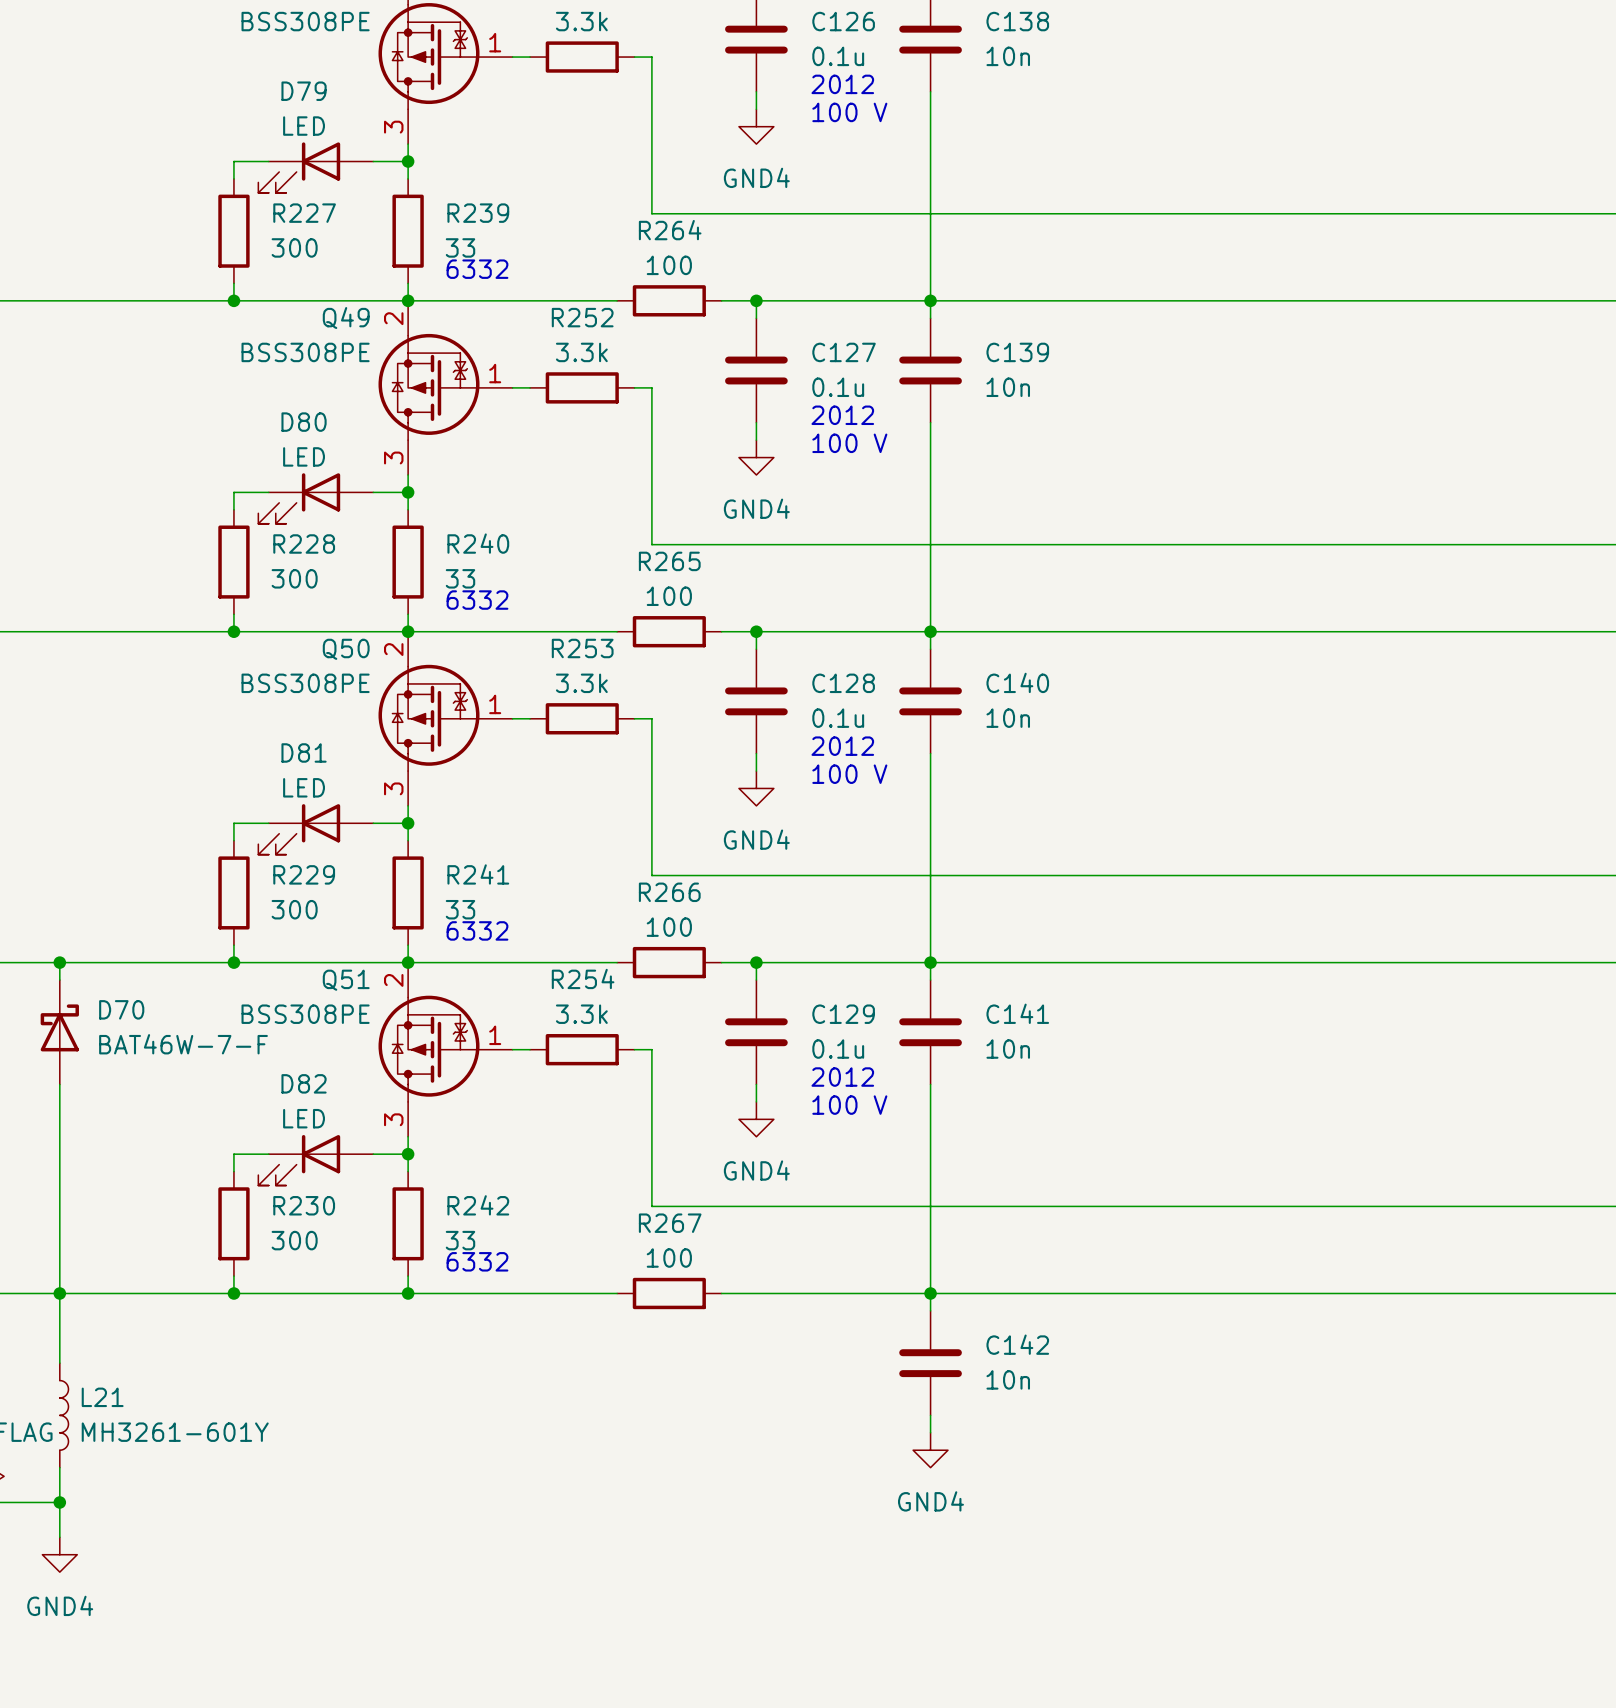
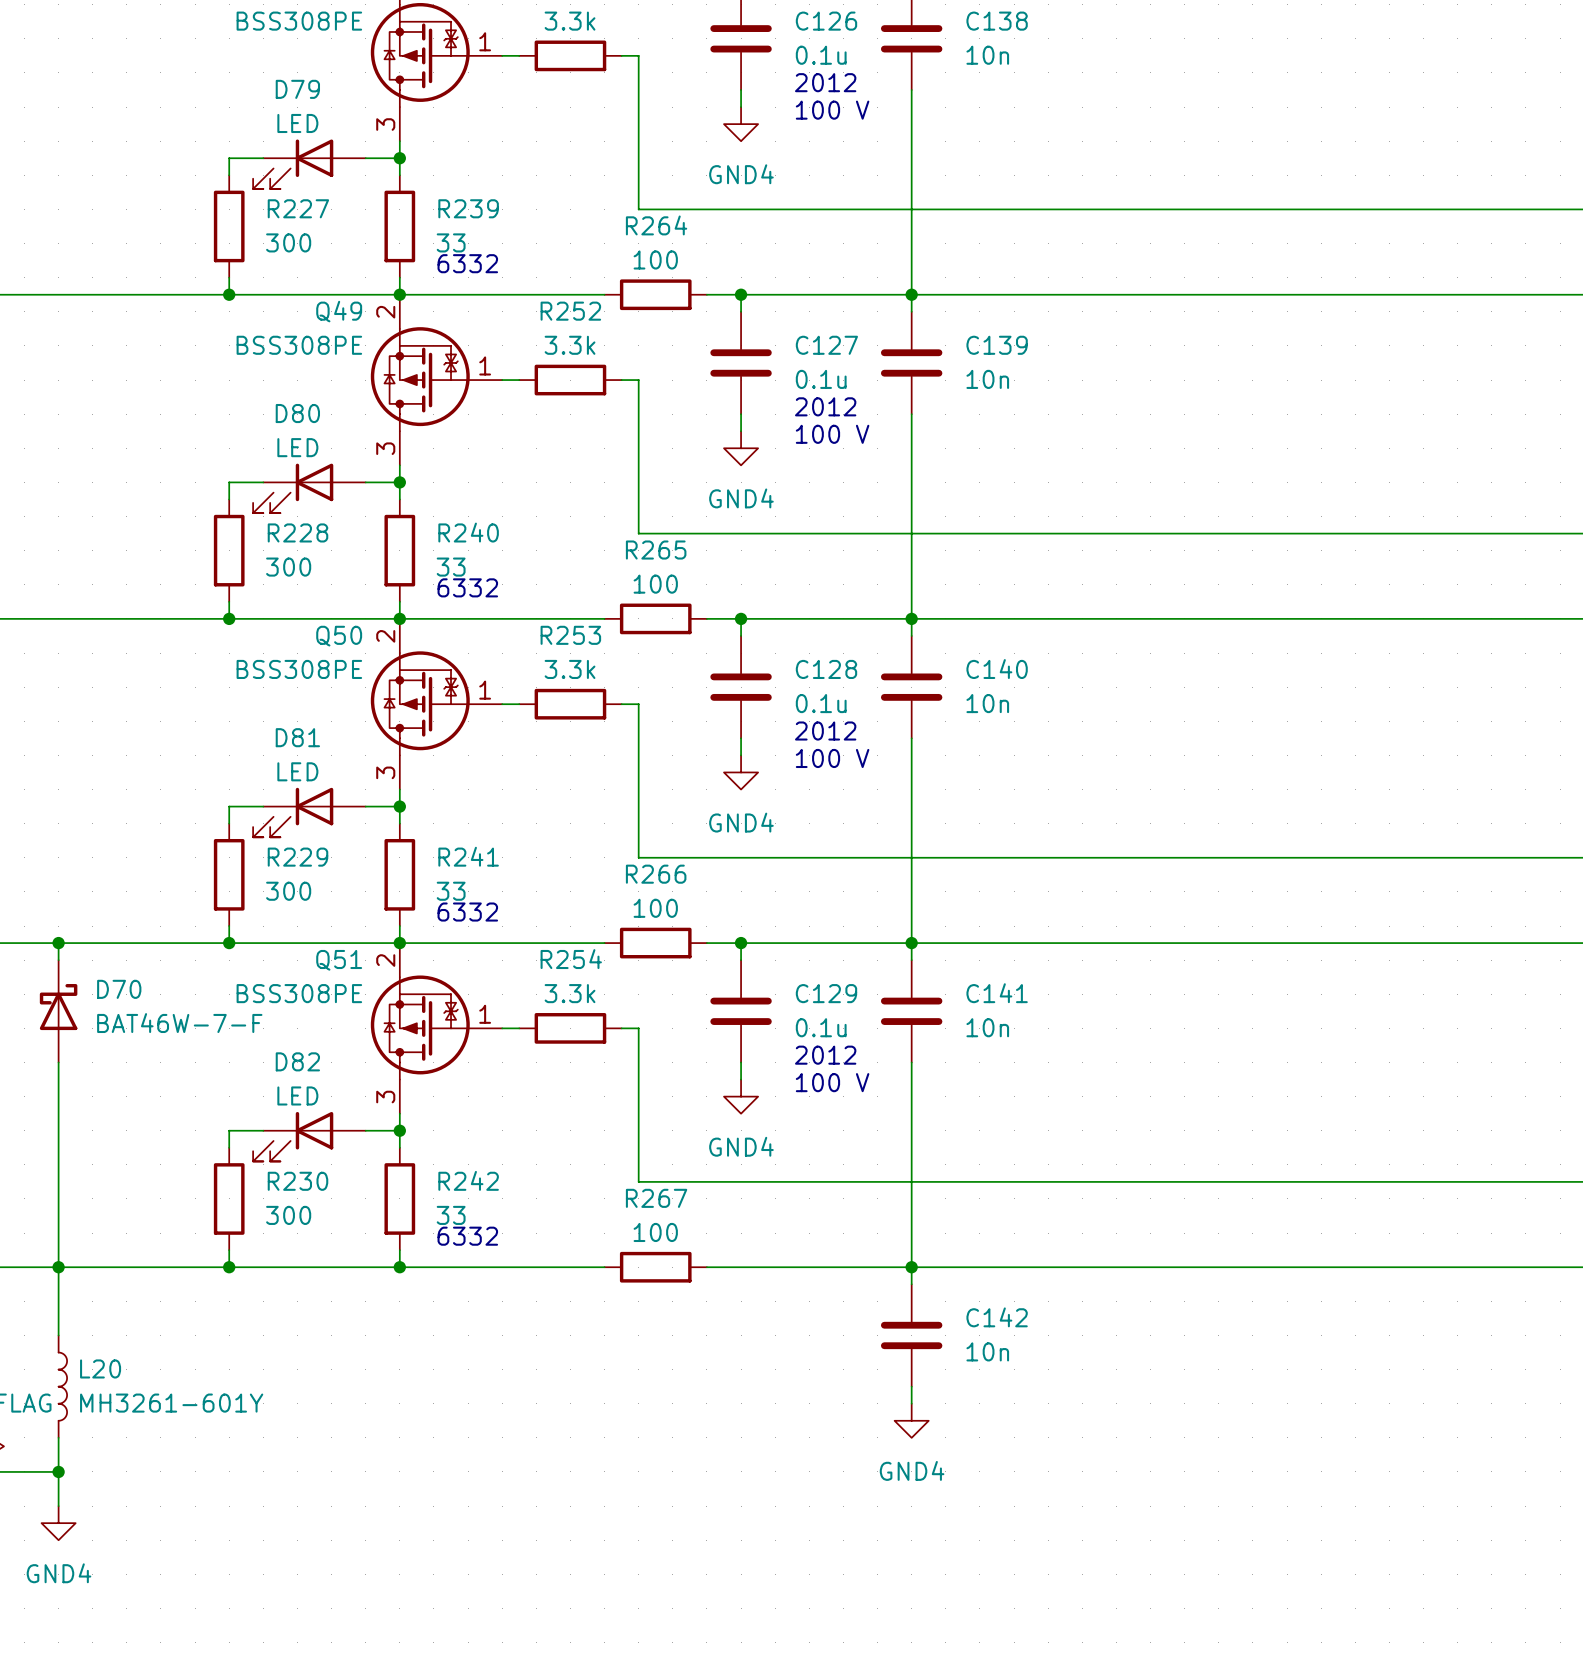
L21 name: L21 (102, 1397) -> L20 (100, 1368)

